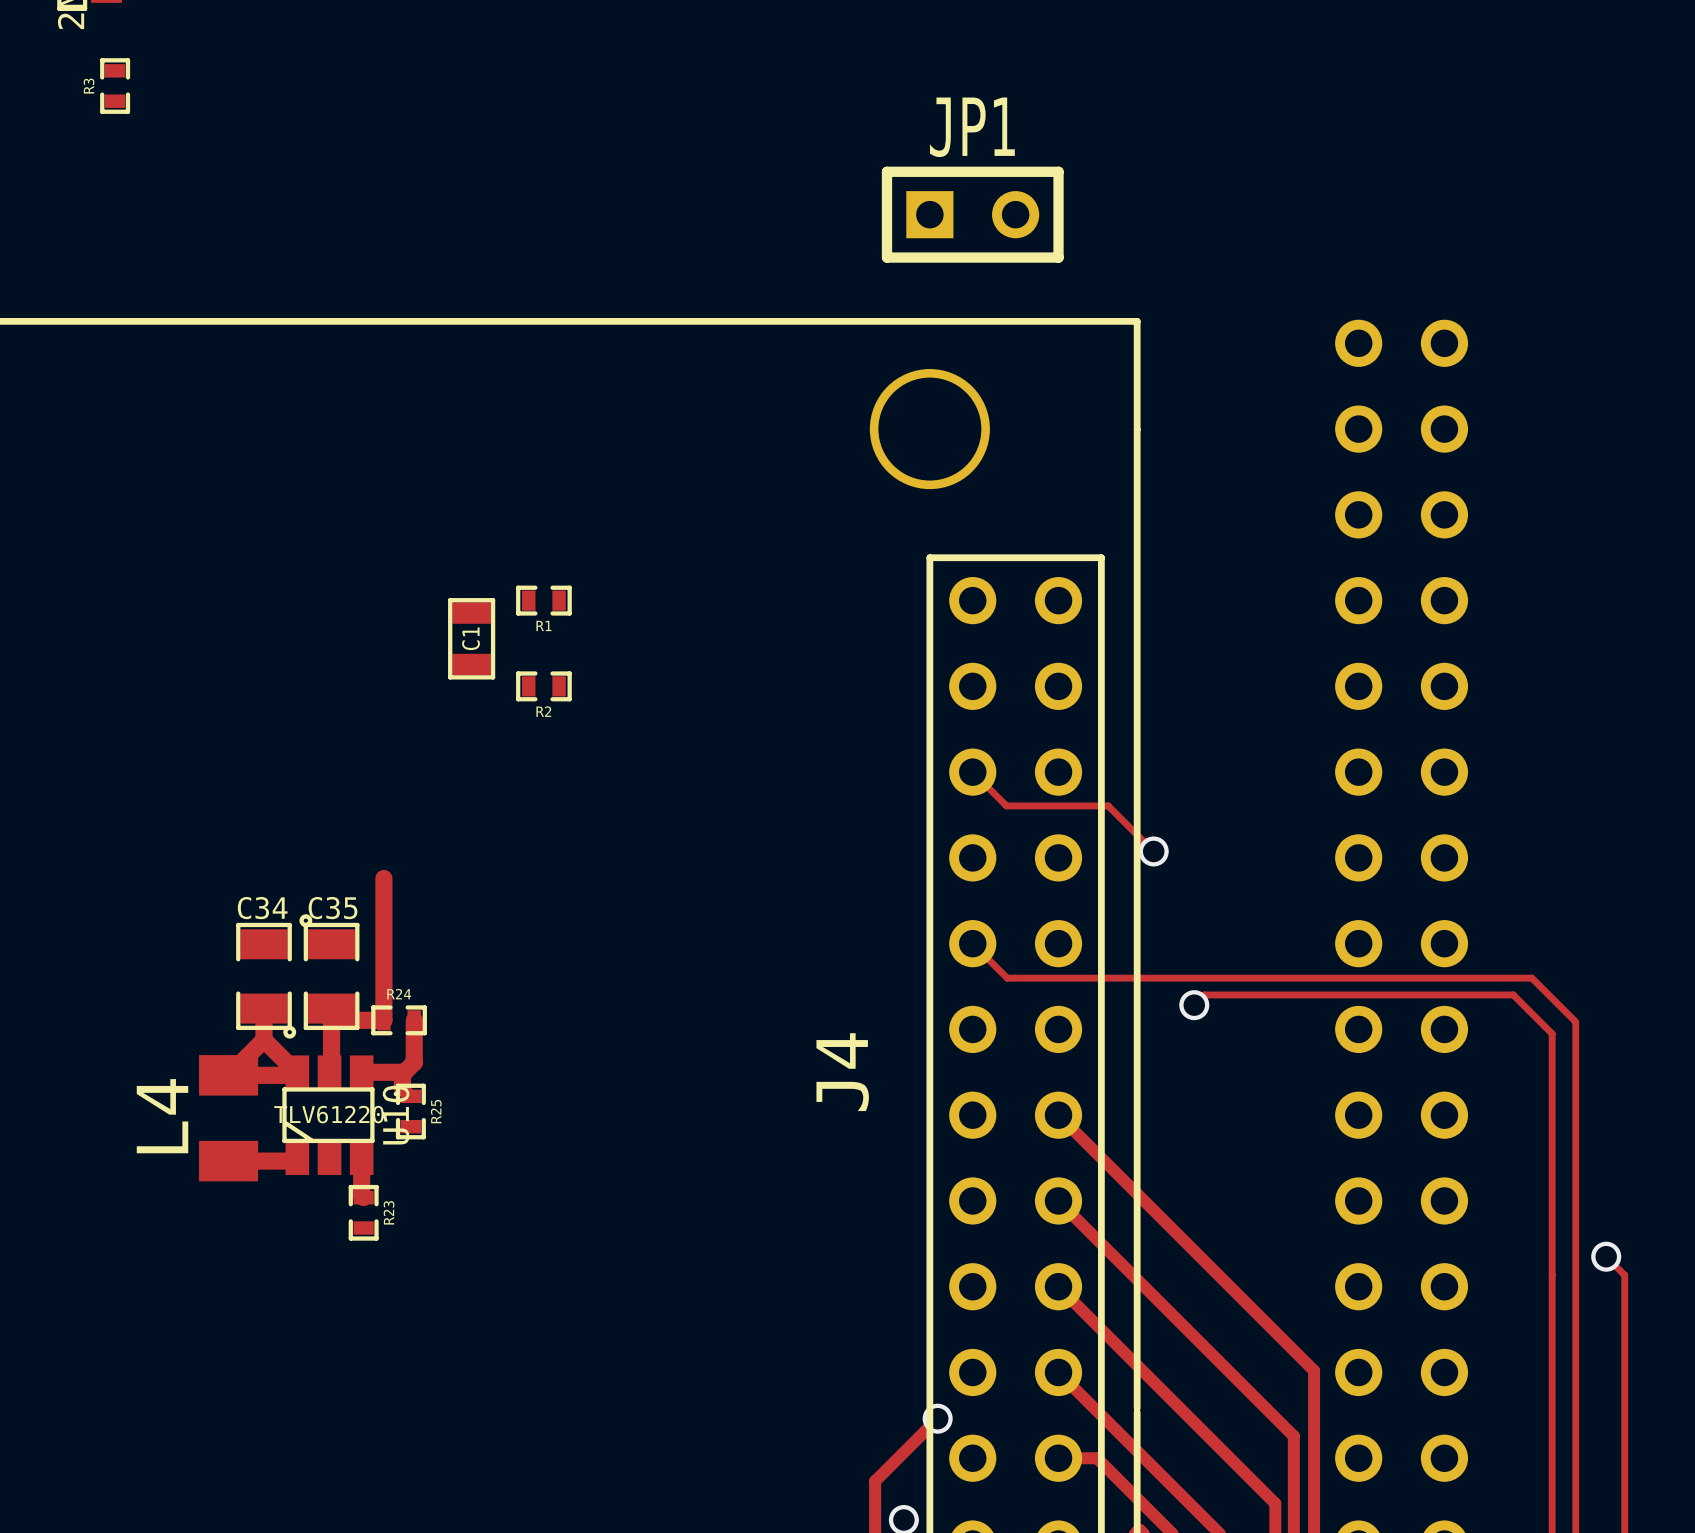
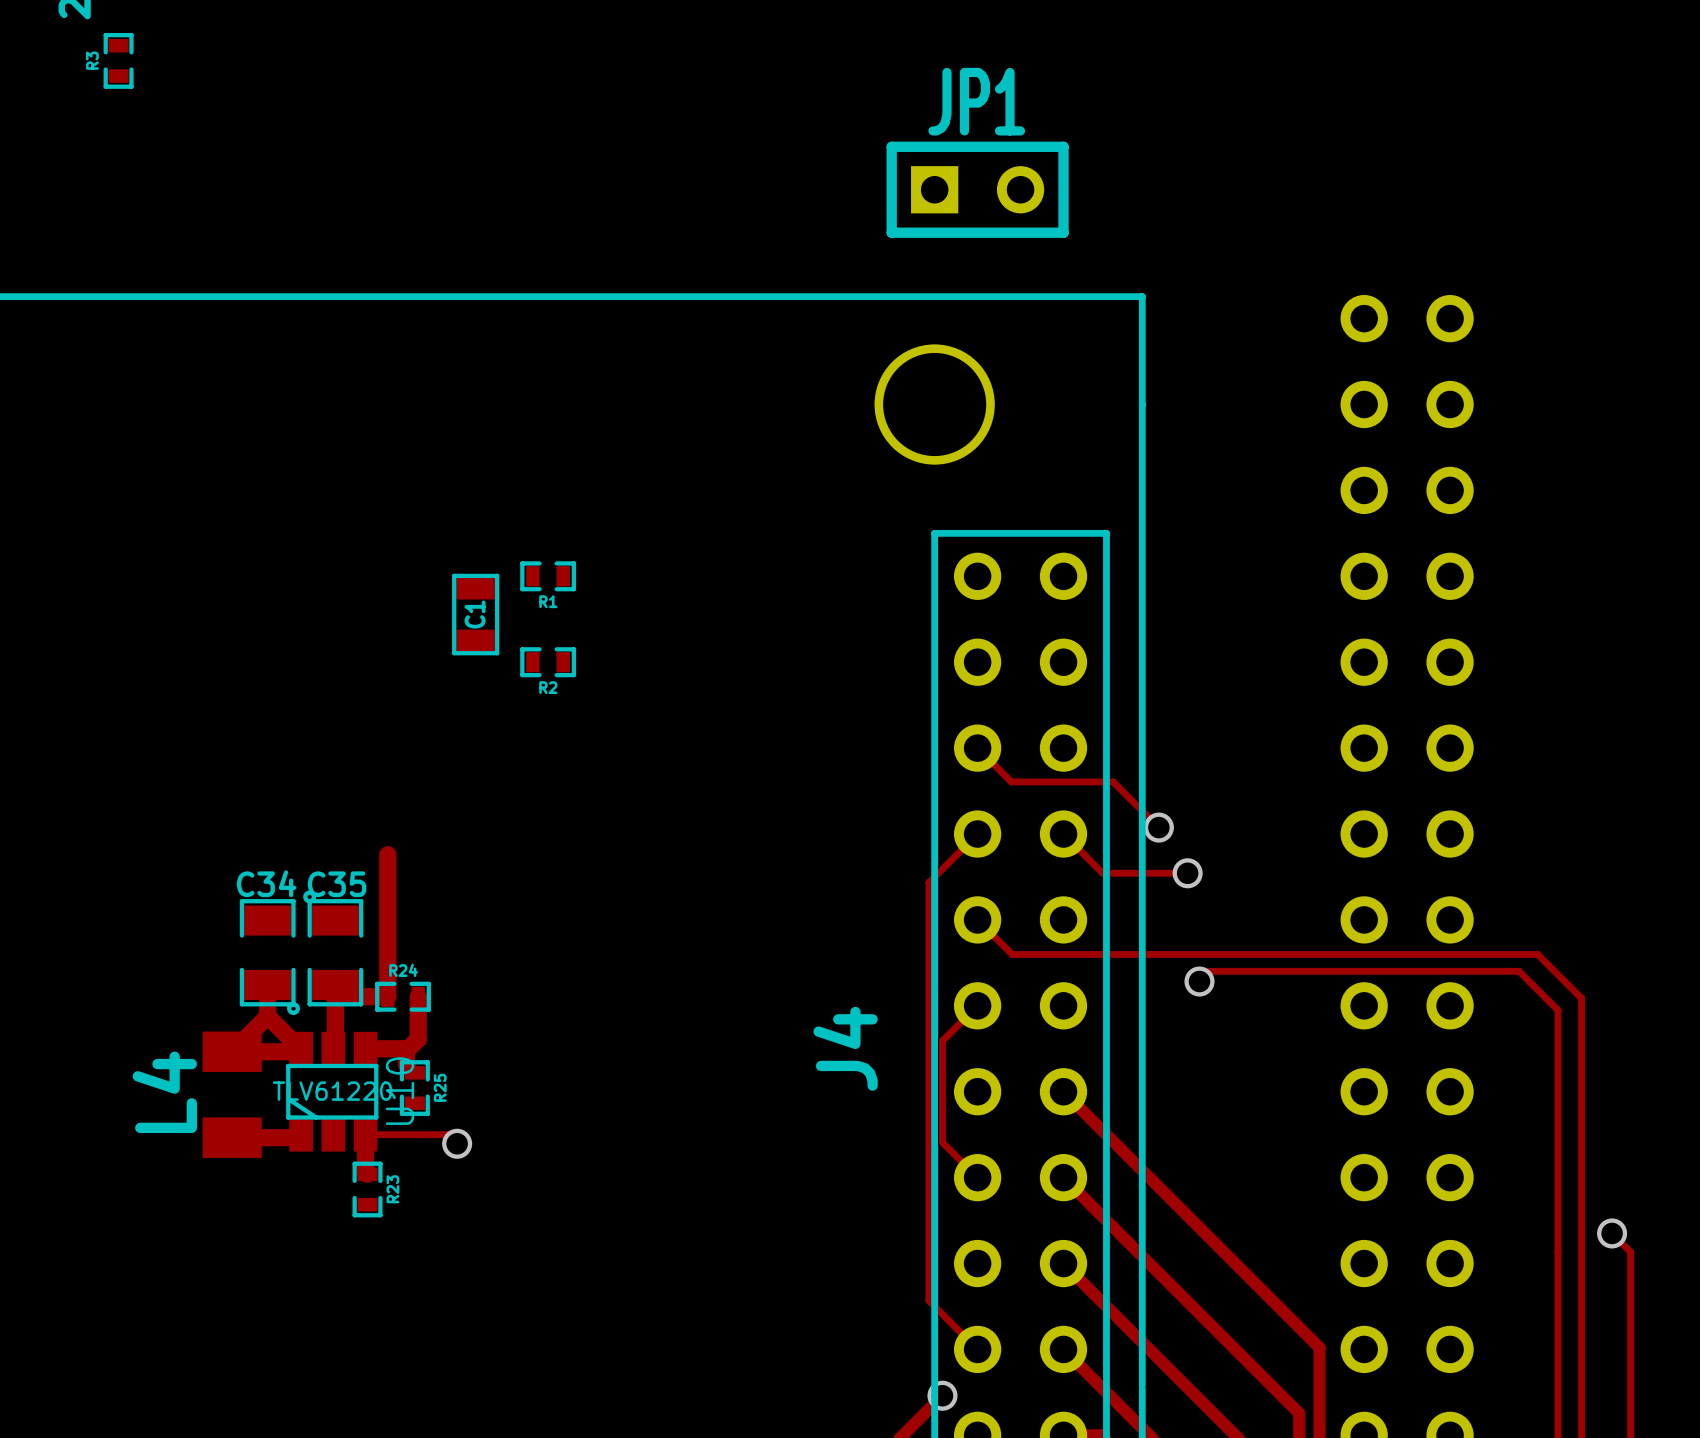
track: none -> (977, 834) (928, 882) (928, 1300) (977, 1349)
track: none -> (1063, 834) (1102, 873) (1187, 873)
via: none -> (1187, 873)
track: none -> (977, 1005) (942, 1040) (942, 1142) (977, 1177)
track: none -> (365, 1134) (448, 1134) (457, 1143)
via: none -> (457, 1143)

